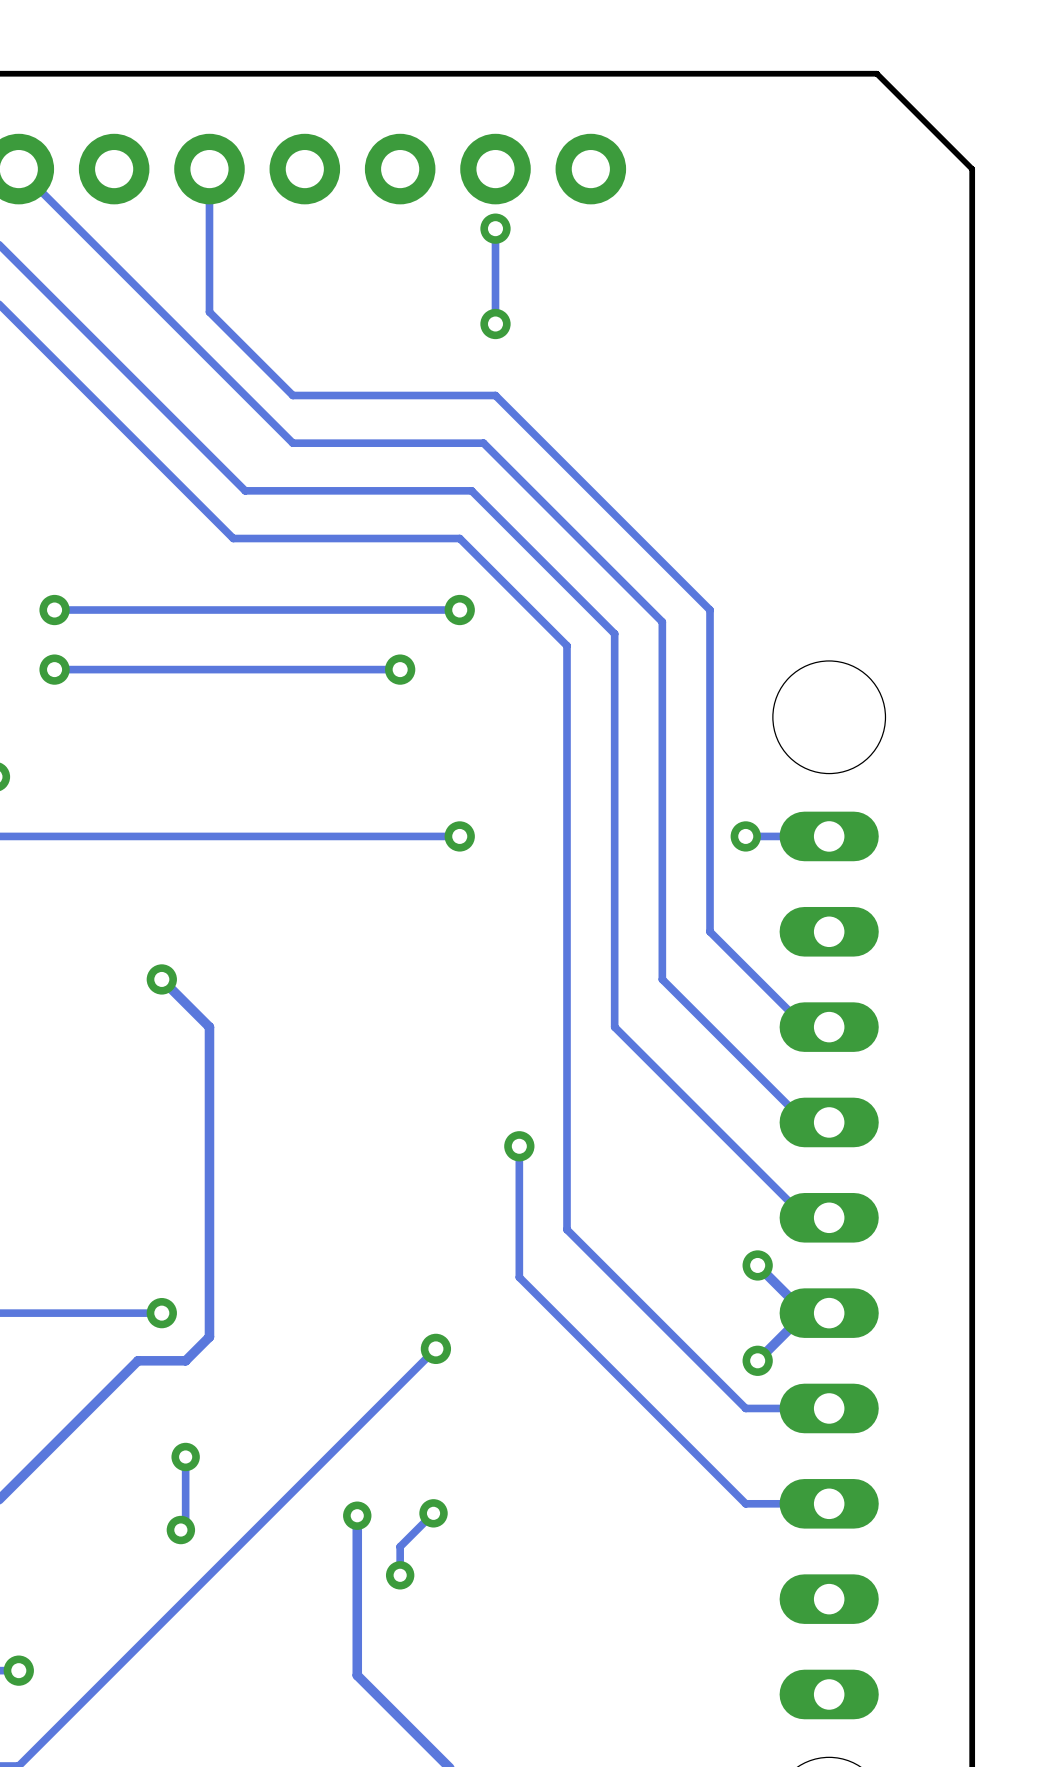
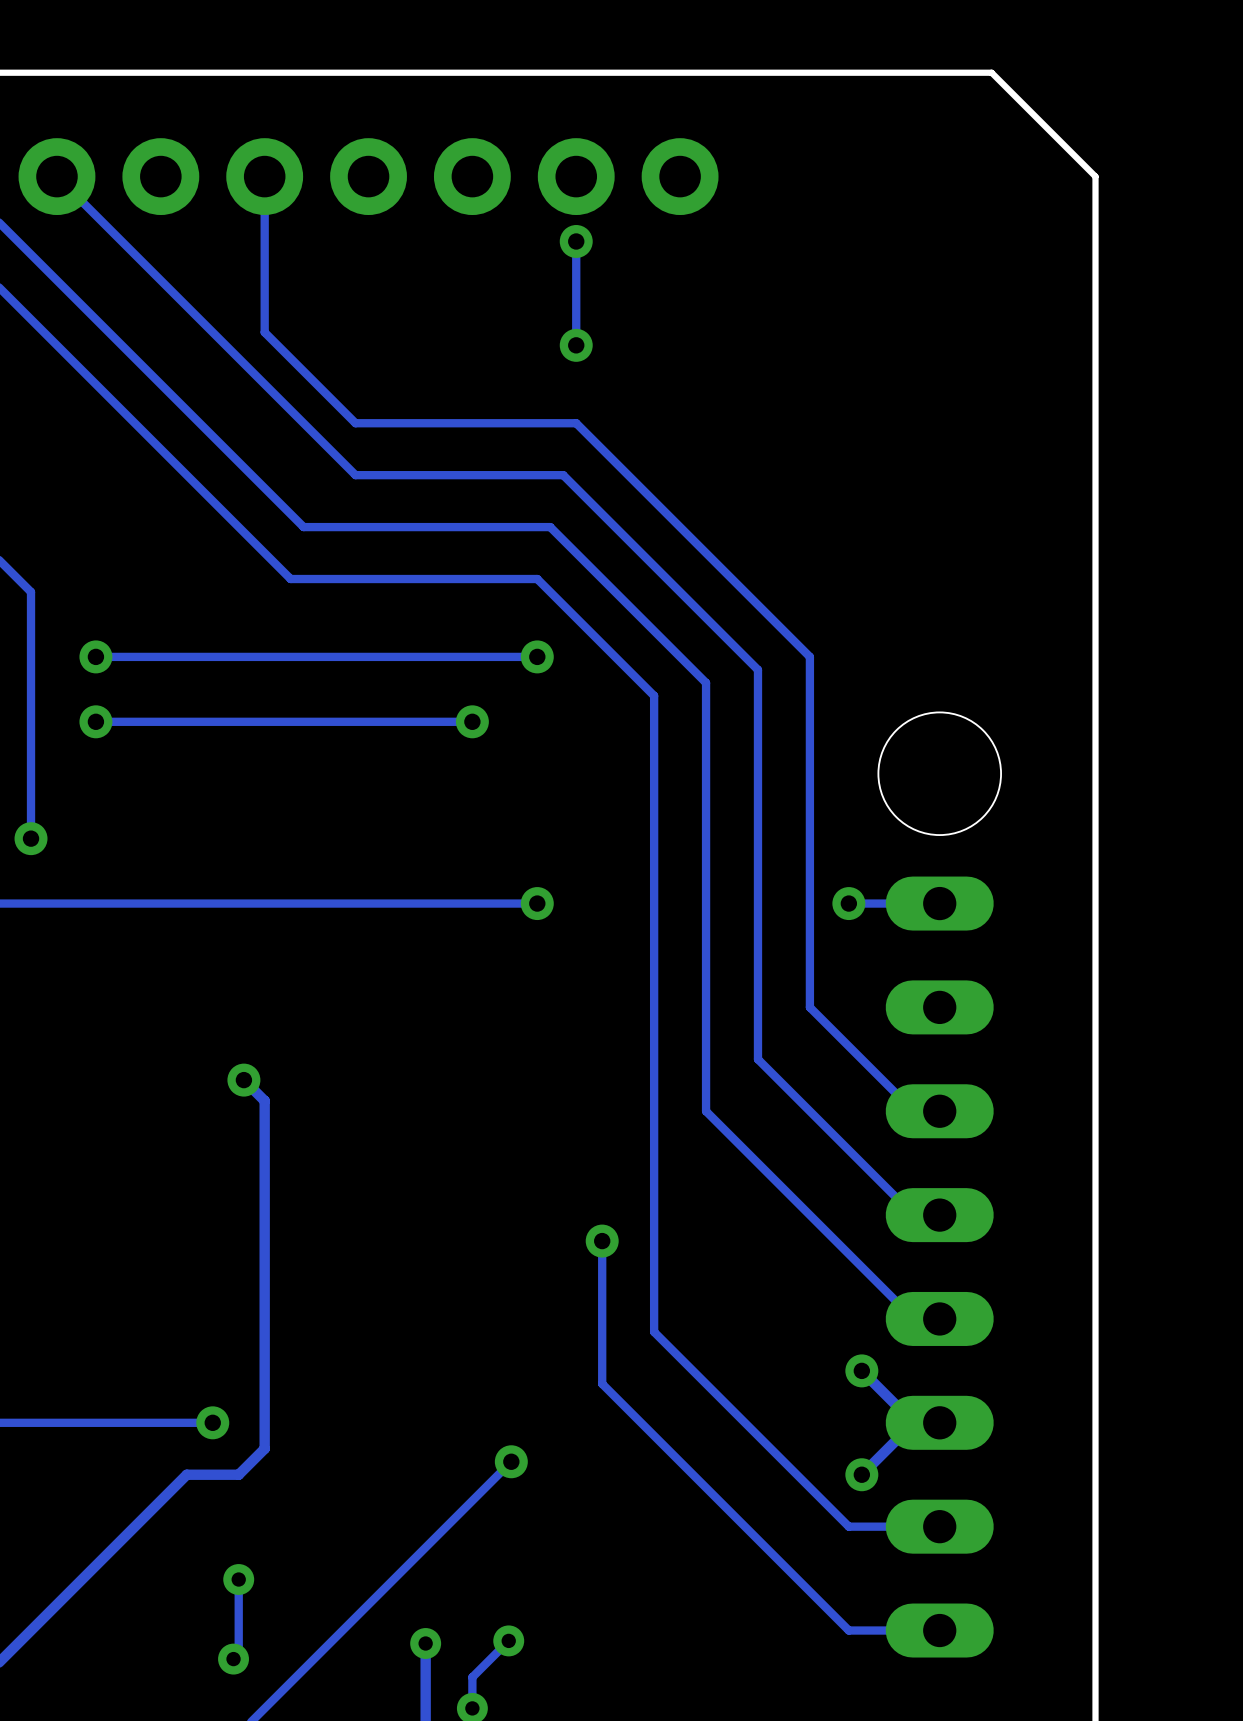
track: (161, 979) (209, 1027) -> (243, 1080) (264, 1100) (264, 1111)
via position: (161, 979) -> (243, 1080)

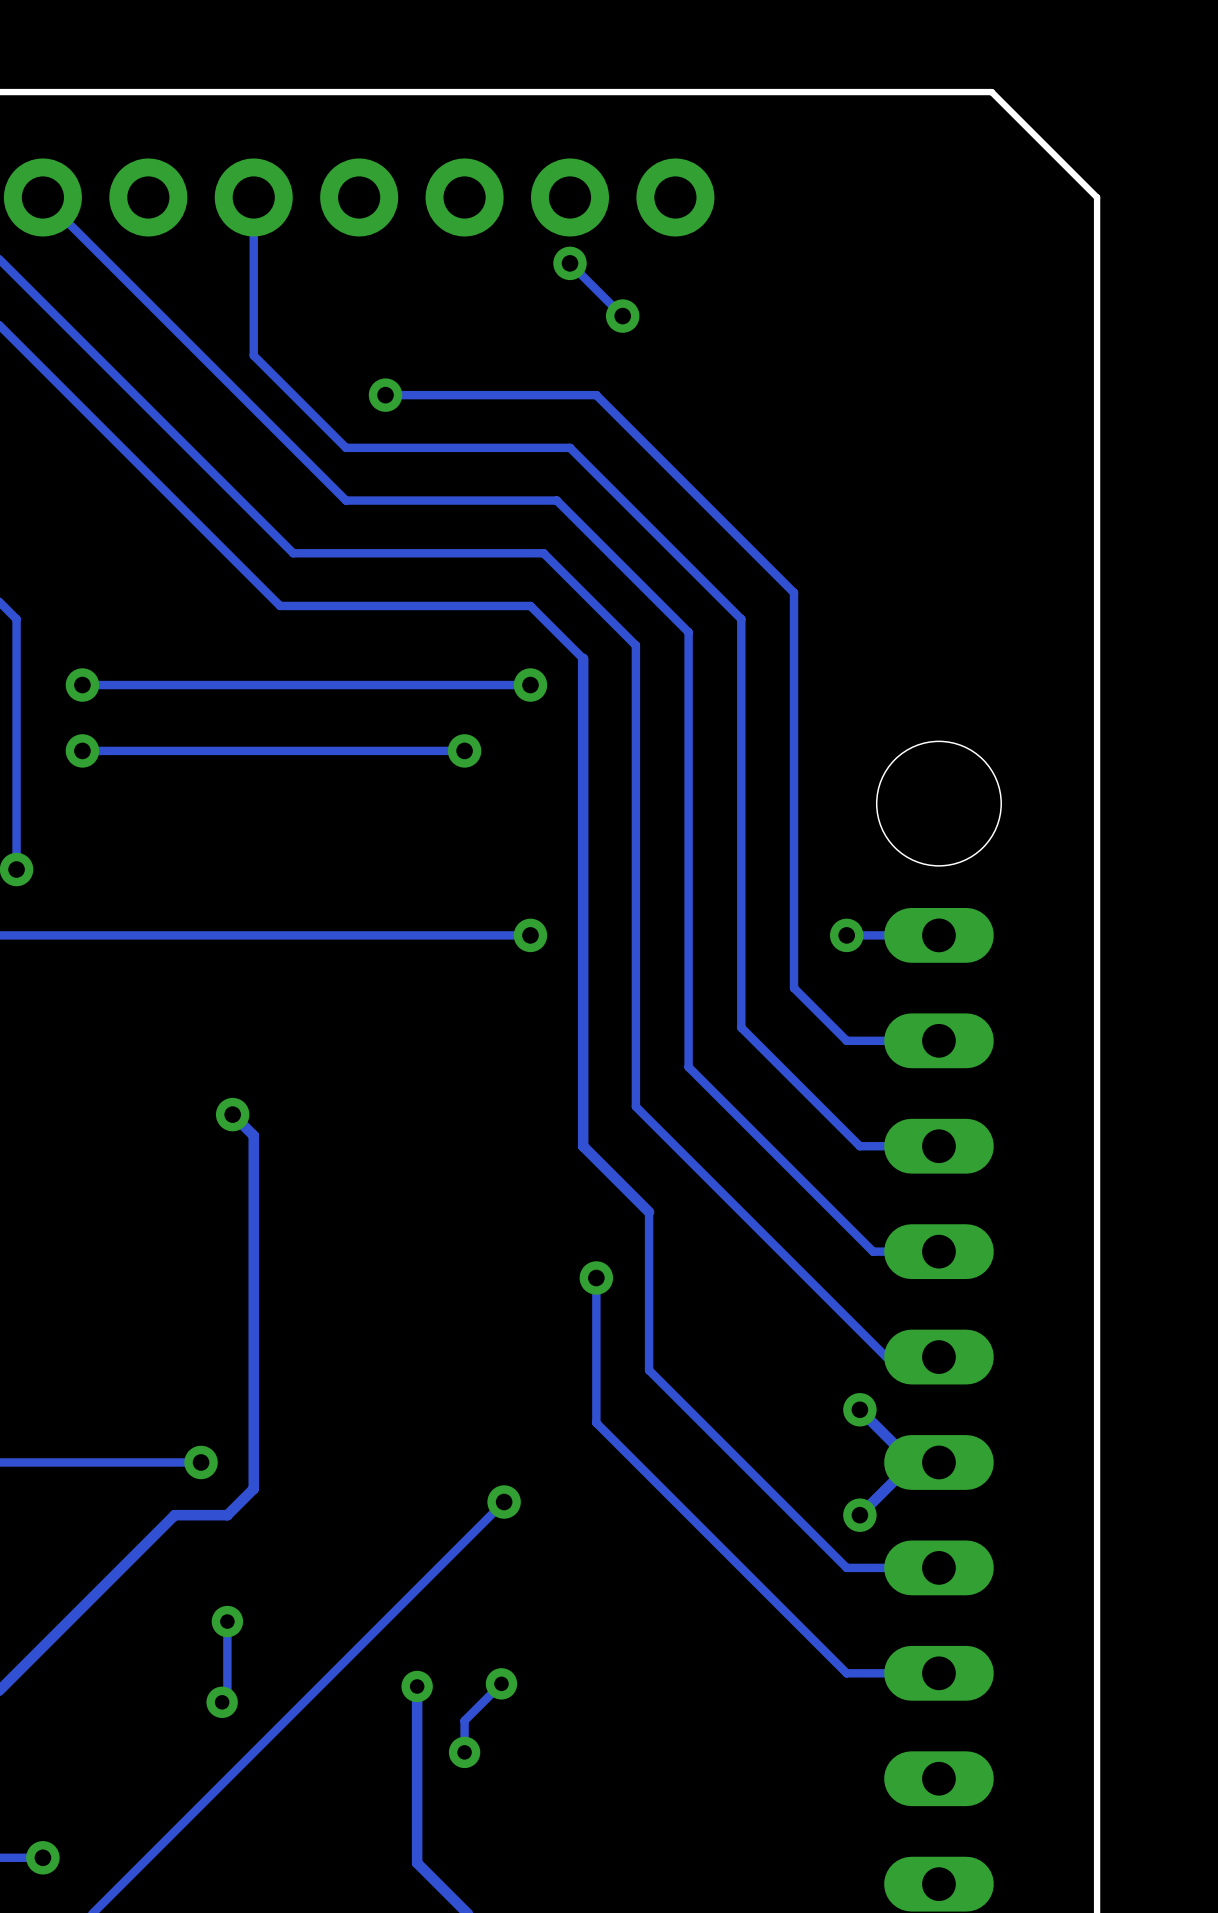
track: (576, 241) (576, 345) -> (570, 263) (622, 316)
via position: (576, 345) -> (622, 316)
track: none -> (385, 395) (596, 395) (794, 592) (794, 988) (846, 1040) (938, 1040)
via: none -> (385, 395)
track: (745, 591) (809, 656) (809, 1007) (913, 1111) -> (741, 619) (741, 1027) (859, 1146) (912, 1146)
track: (693, 604) (757, 669) (757, 1059) (913, 1215) -> (688, 632) (688, 1067) (873, 1251) (912, 1251)
track: (641, 617) (706, 682) (706, 1111) (913, 1318) -> (635, 645) (635, 1106) (886, 1357) (912, 1357)
track: (589, 630) (654, 695) (654, 1176) -> (583, 658) (583, 1146) (649, 1212)

